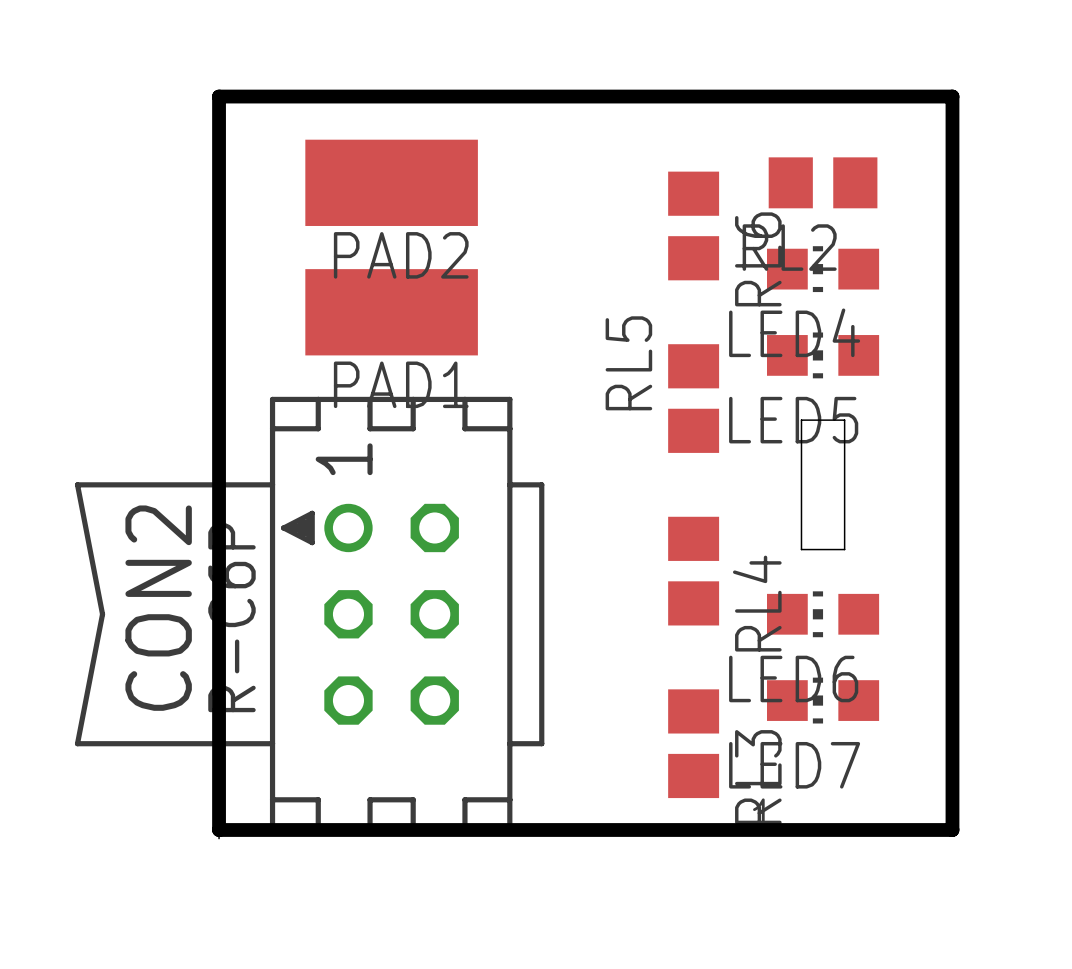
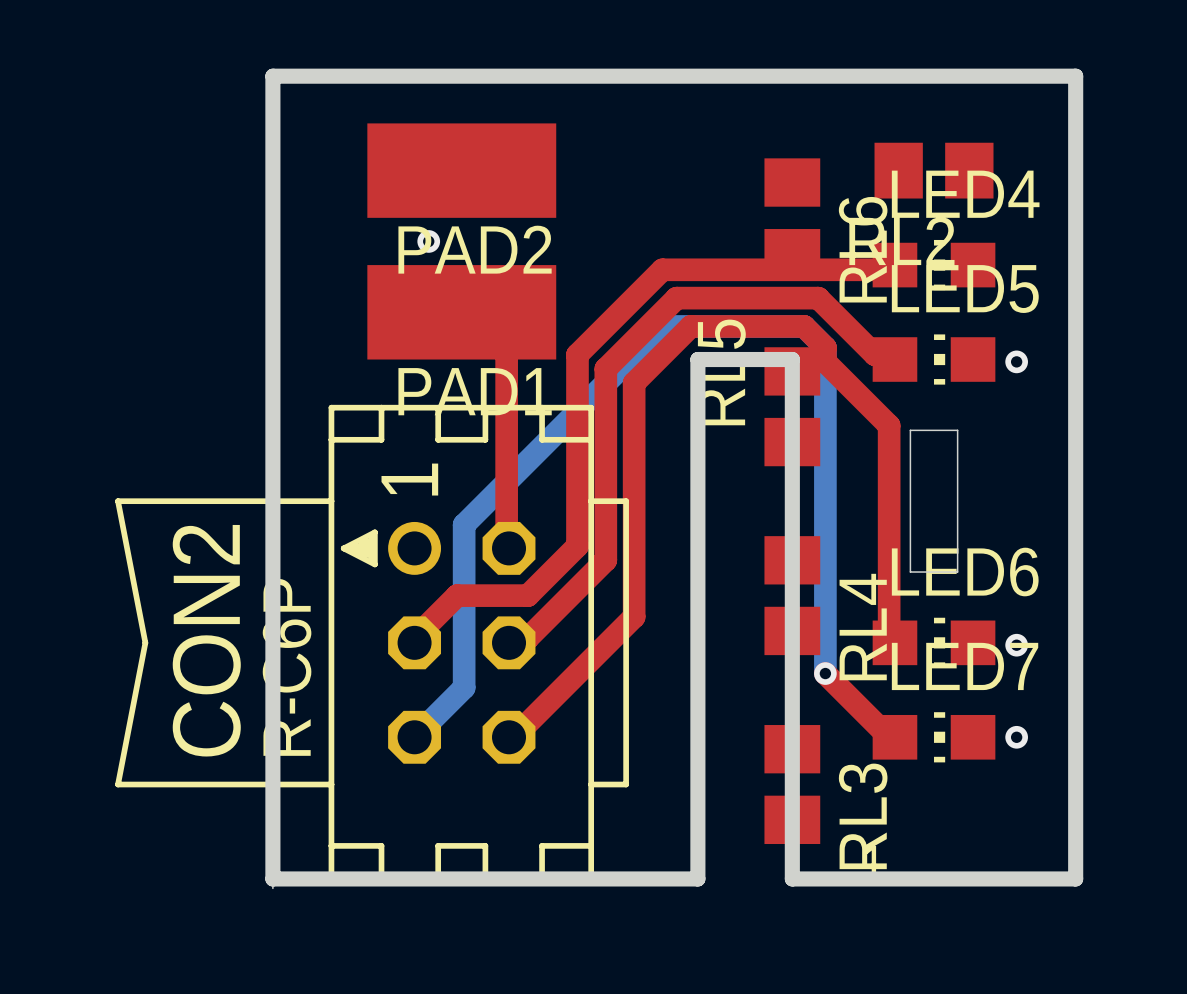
via: none -> (428, 241)
top track: none -> (894, 265) (889, 269) (662, 269) (577, 354) (577, 546) (527, 595) (457, 595) (414, 638) (414, 642)
LED4 rotation: 0° (823, 269) -> 180° (934, 265)
top track: none -> (461, 312) (464, 312) (506, 354) (506, 546) (509, 548)
top track: none -> (894, 359) (889, 354) (874, 354) (818, 298) (676, 298) (605, 368) (605, 560) (527, 638) (513, 638) (509, 642)
LED5 rotation: 0° (823, 355) -> 180° (934, 359)
via: none -> (1016, 361)
top track: none -> (894, 642) (889, 638) (889, 425) (825, 361) (825, 347) (804, 326) (690, 326) (634, 383) (634, 616) (513, 737) (509, 737)
LED6 rotation: 0° (823, 614) -> 180° (934, 642)
via: none -> (1016, 645)
top track: none -> (825, 673) (889, 737) (894, 737)
bottom track: none -> (825, 673) (825, 347) (804, 326) (662, 326) (464, 524) (464, 687) (414, 737)
via: none -> (825, 673)
LED7 rotation: 0° (823, 700) -> 180° (934, 737)
via: none -> (1016, 737)
board edge: (607, 829) (693, 829) -> (697, 878) (697, 359) (792, 359) (792, 878)

